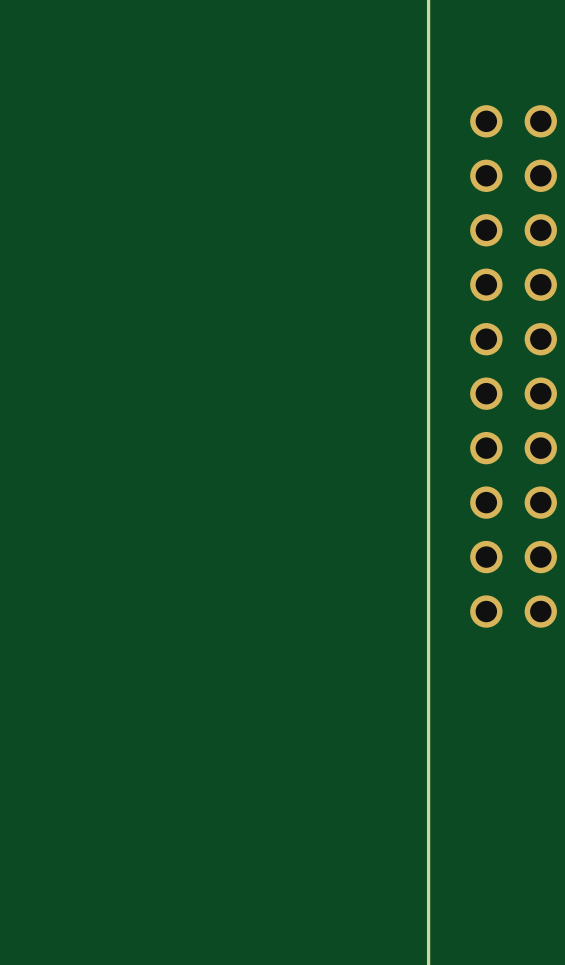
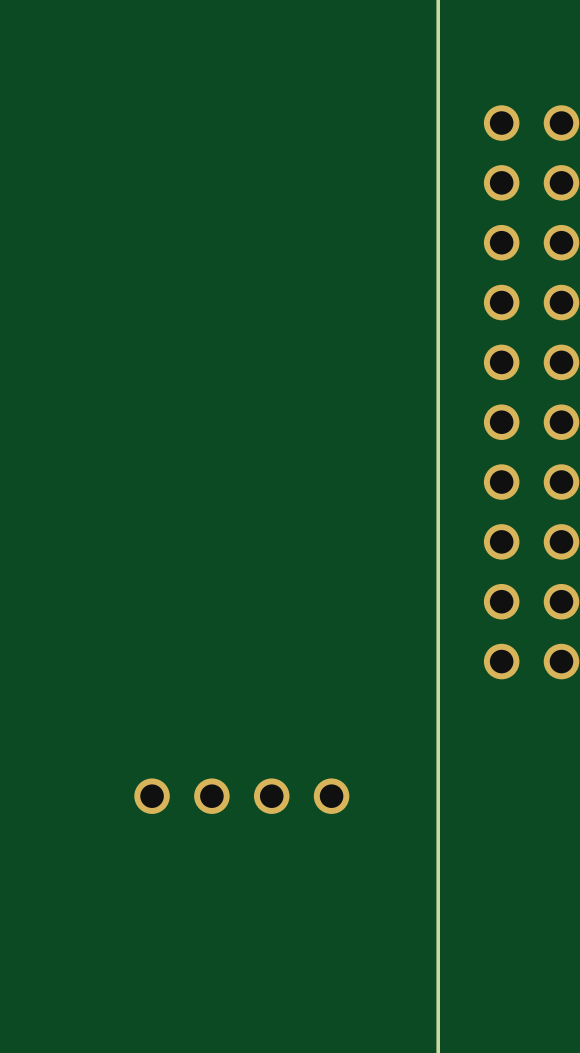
part: none -> (152, 796)
part: none -> (211, 796)
part: none -> (271, 796)
part: none -> (331, 796)

